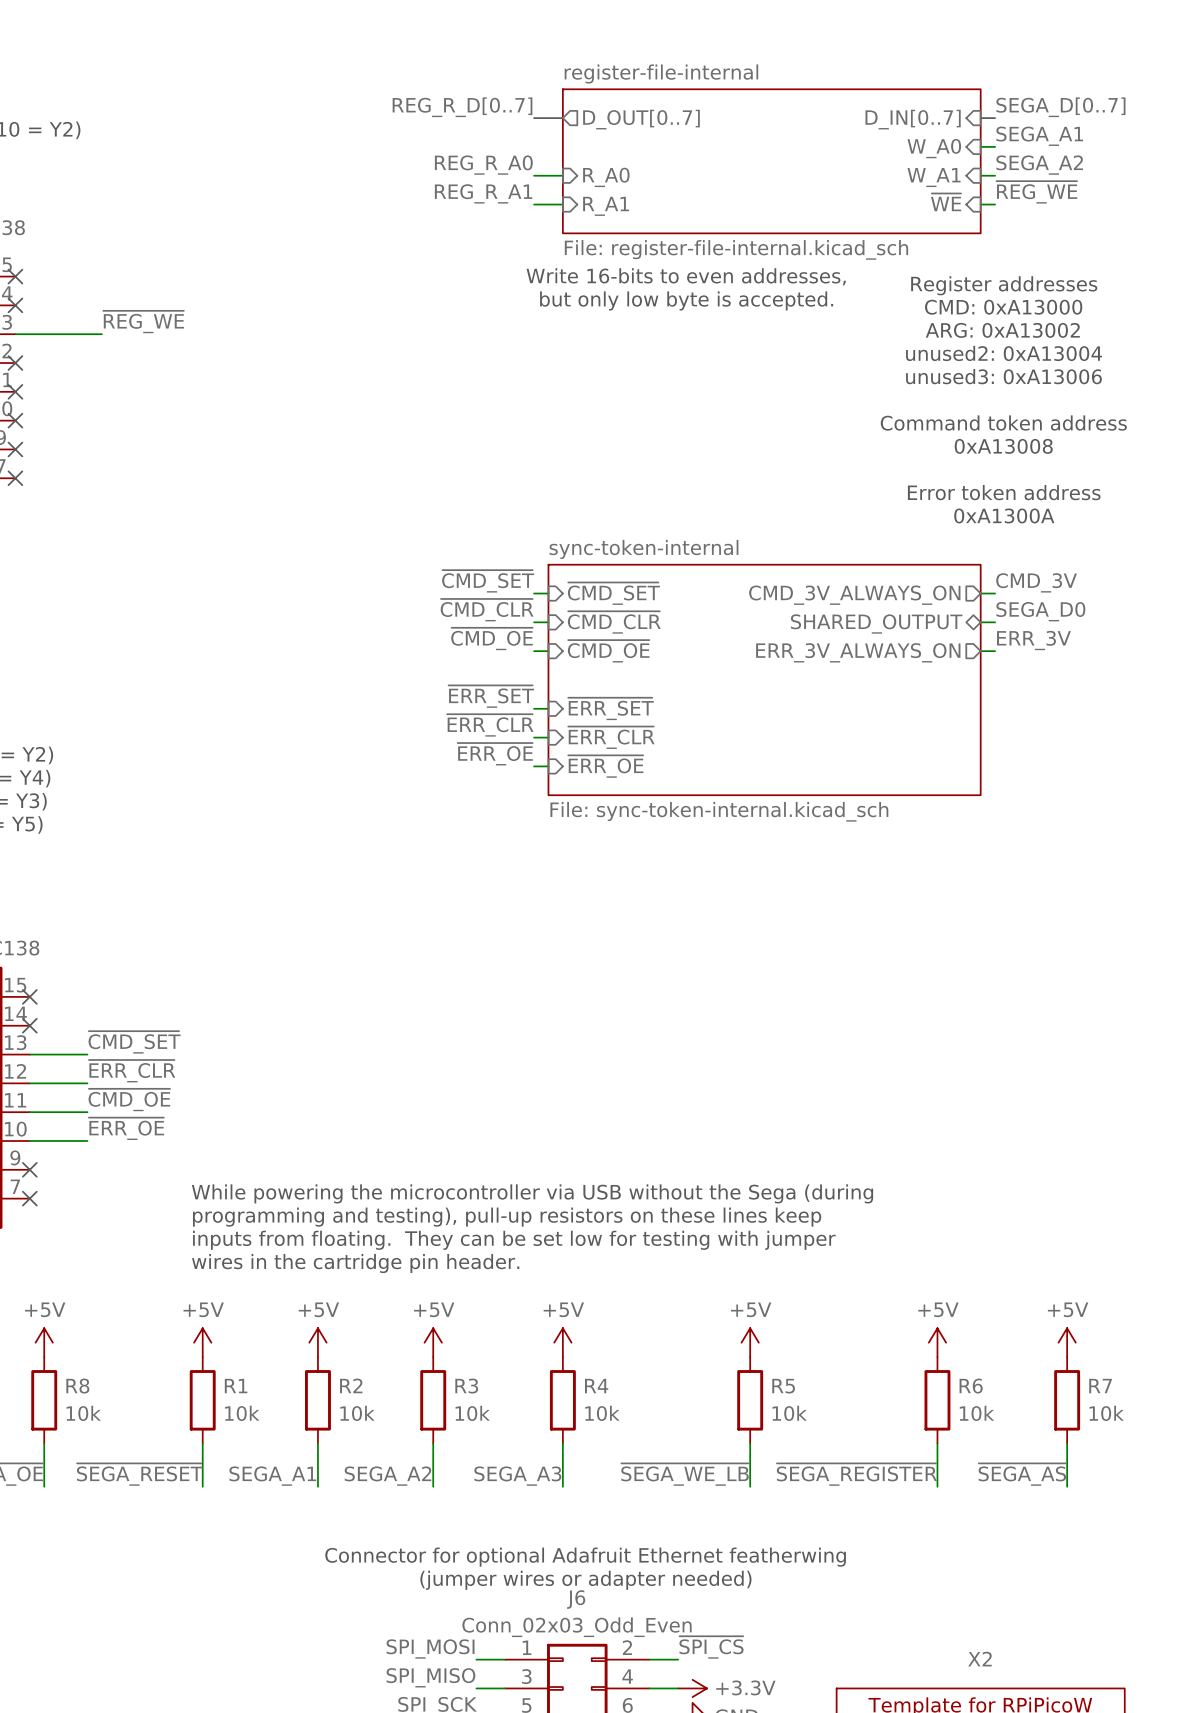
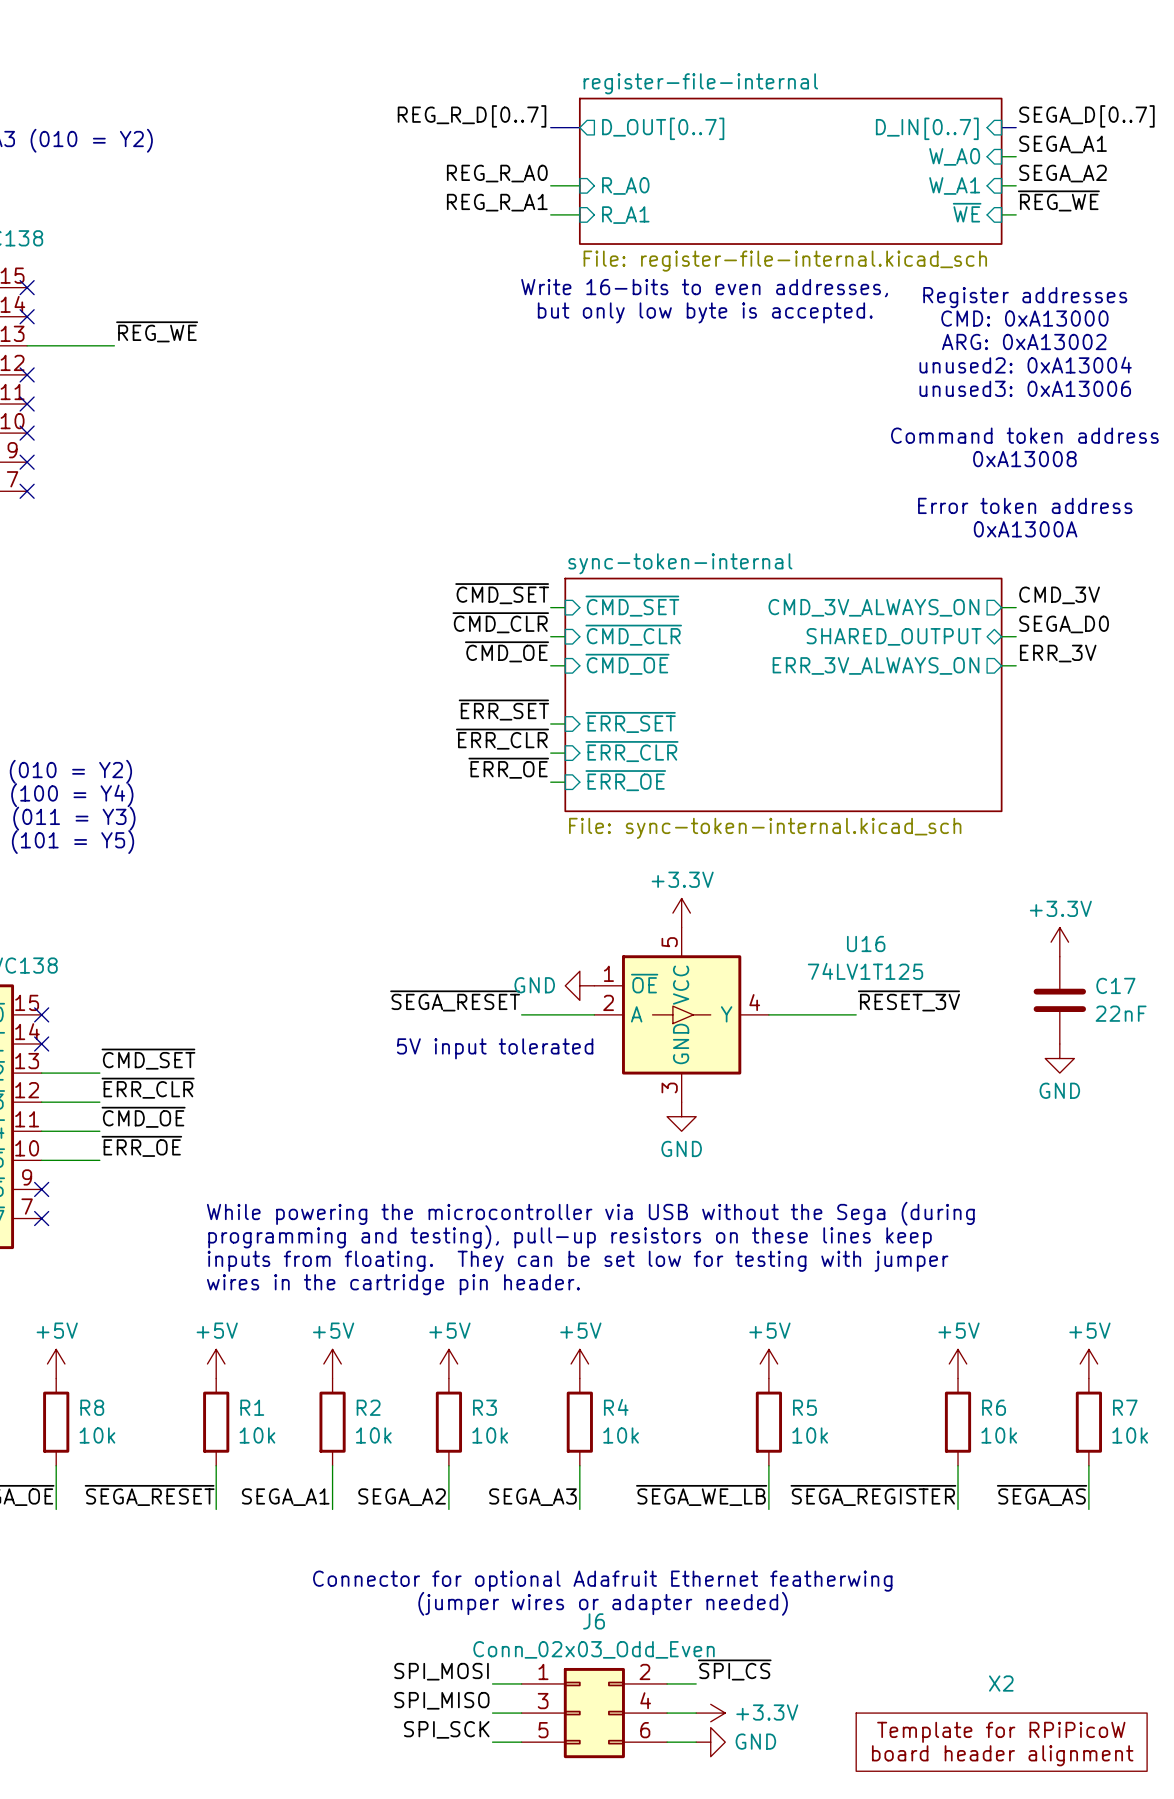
power symbol: none -> +3.3V (681, 913)
power symbol: none -> +3.3V (1059, 942)
power symbol: none -> GND (579, 985)
C17: none -> 22nF (1059, 1000)
label: none -> ~{SEGA_RESET} (455, 1000)
label: none -> ~{RESET_3V} (908, 1000)
wire: none -> (521, 1014) (594, 1014)
U16: none -> 74LV1T125 (681, 1014)
wire: none -> (768, 1014) (856, 1014)
text: none -> 5V input tolerated (495, 1048)
power symbol: none -> GND (1059, 1058)
power symbol: none -> GND (681, 1116)

